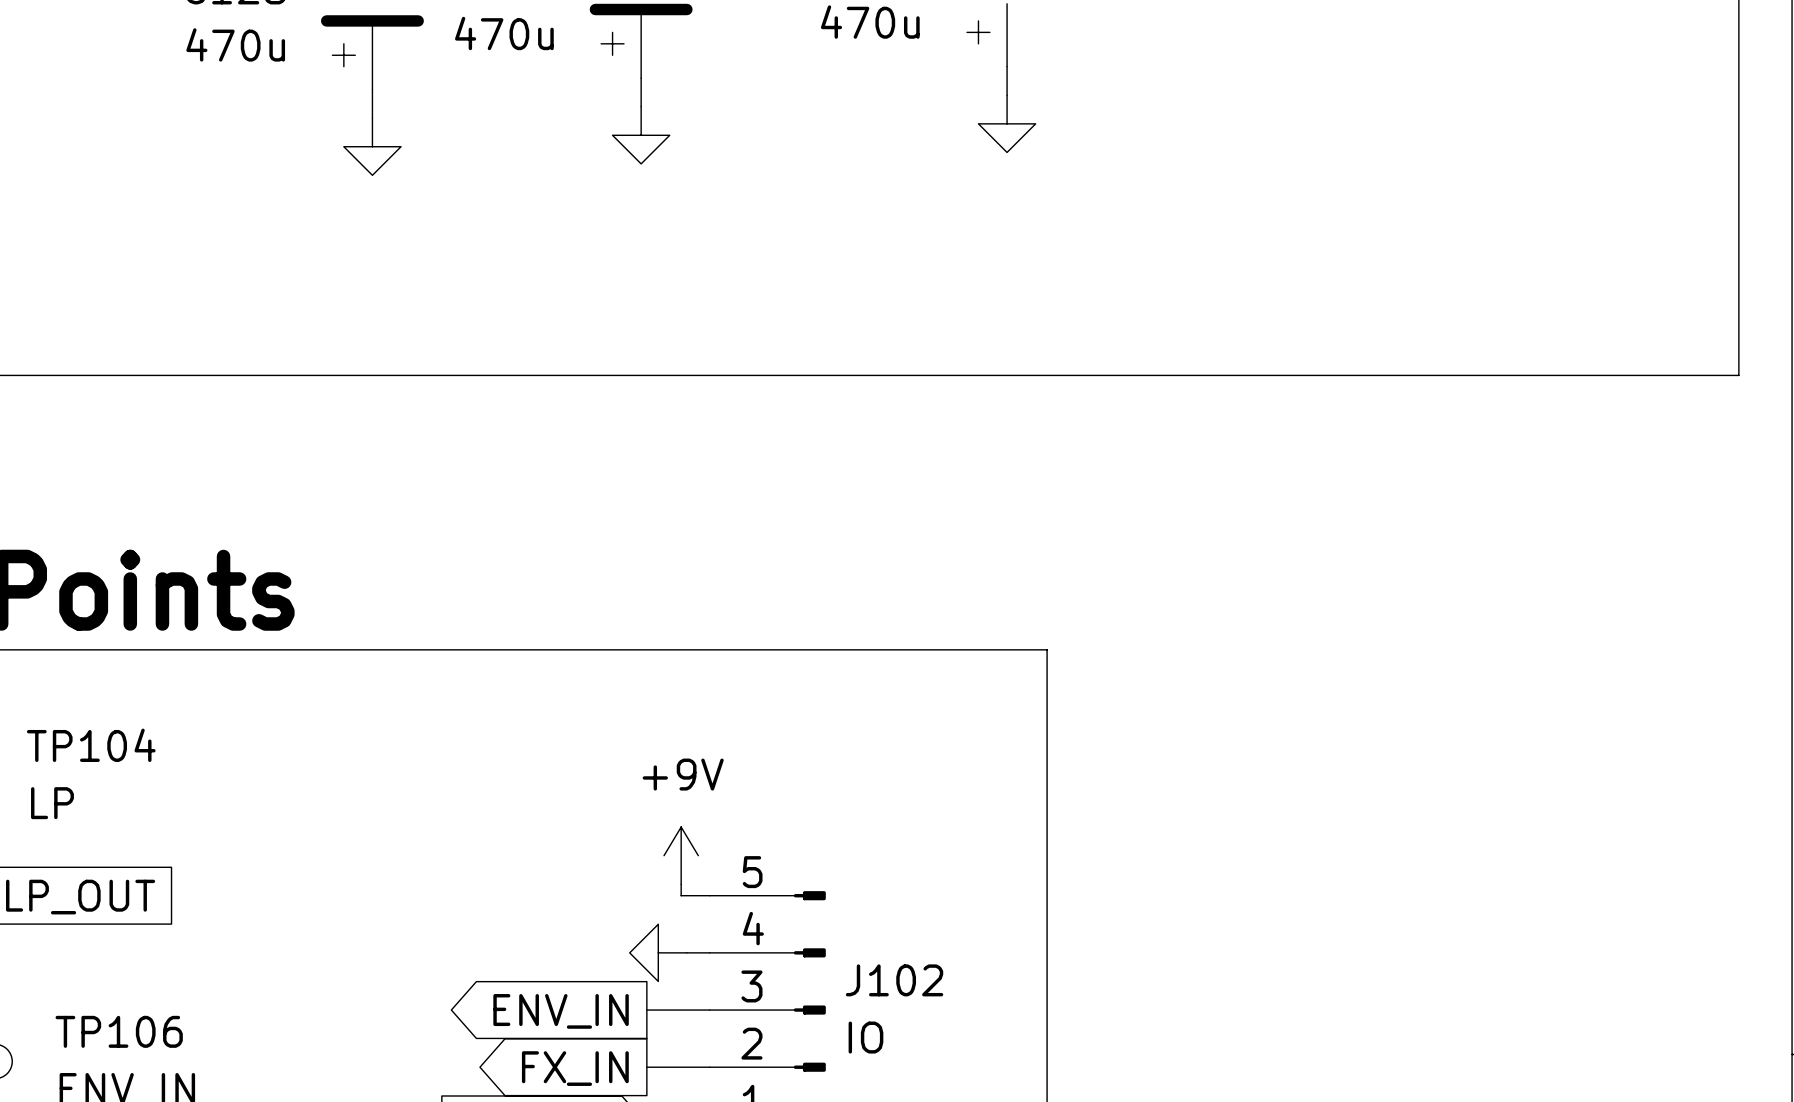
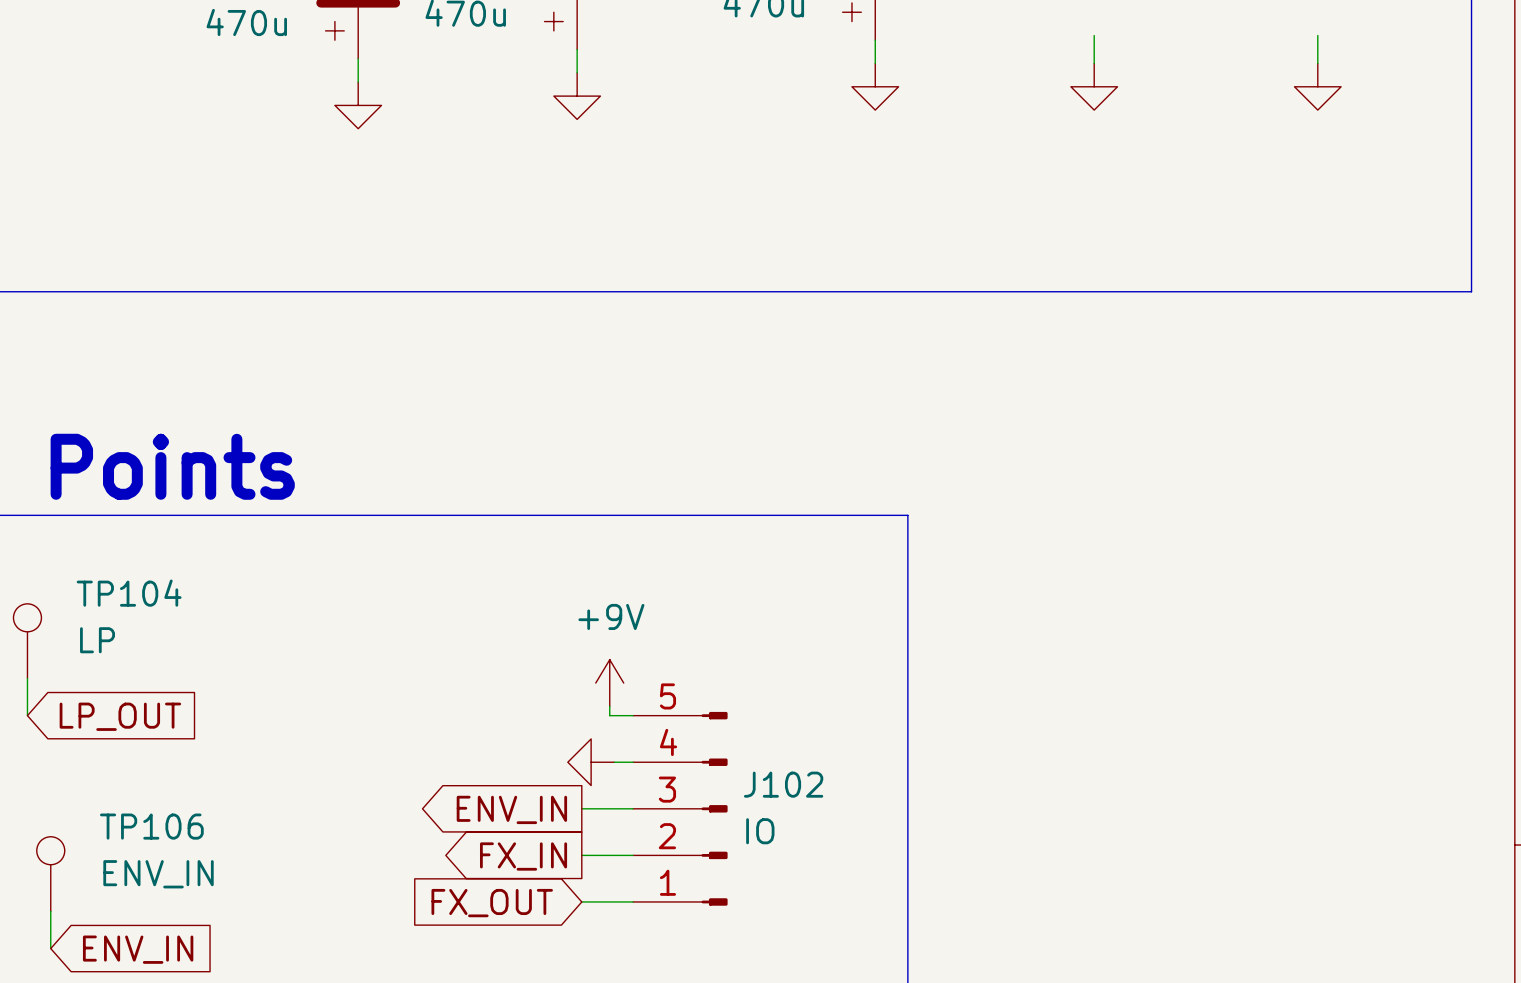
wire: none -> (1094, 35) (1094, 63)
wire: none -> (1317, 35) (1317, 63)
power symbol: none -> (1094, 86)
power symbol: none -> (1317, 86)

